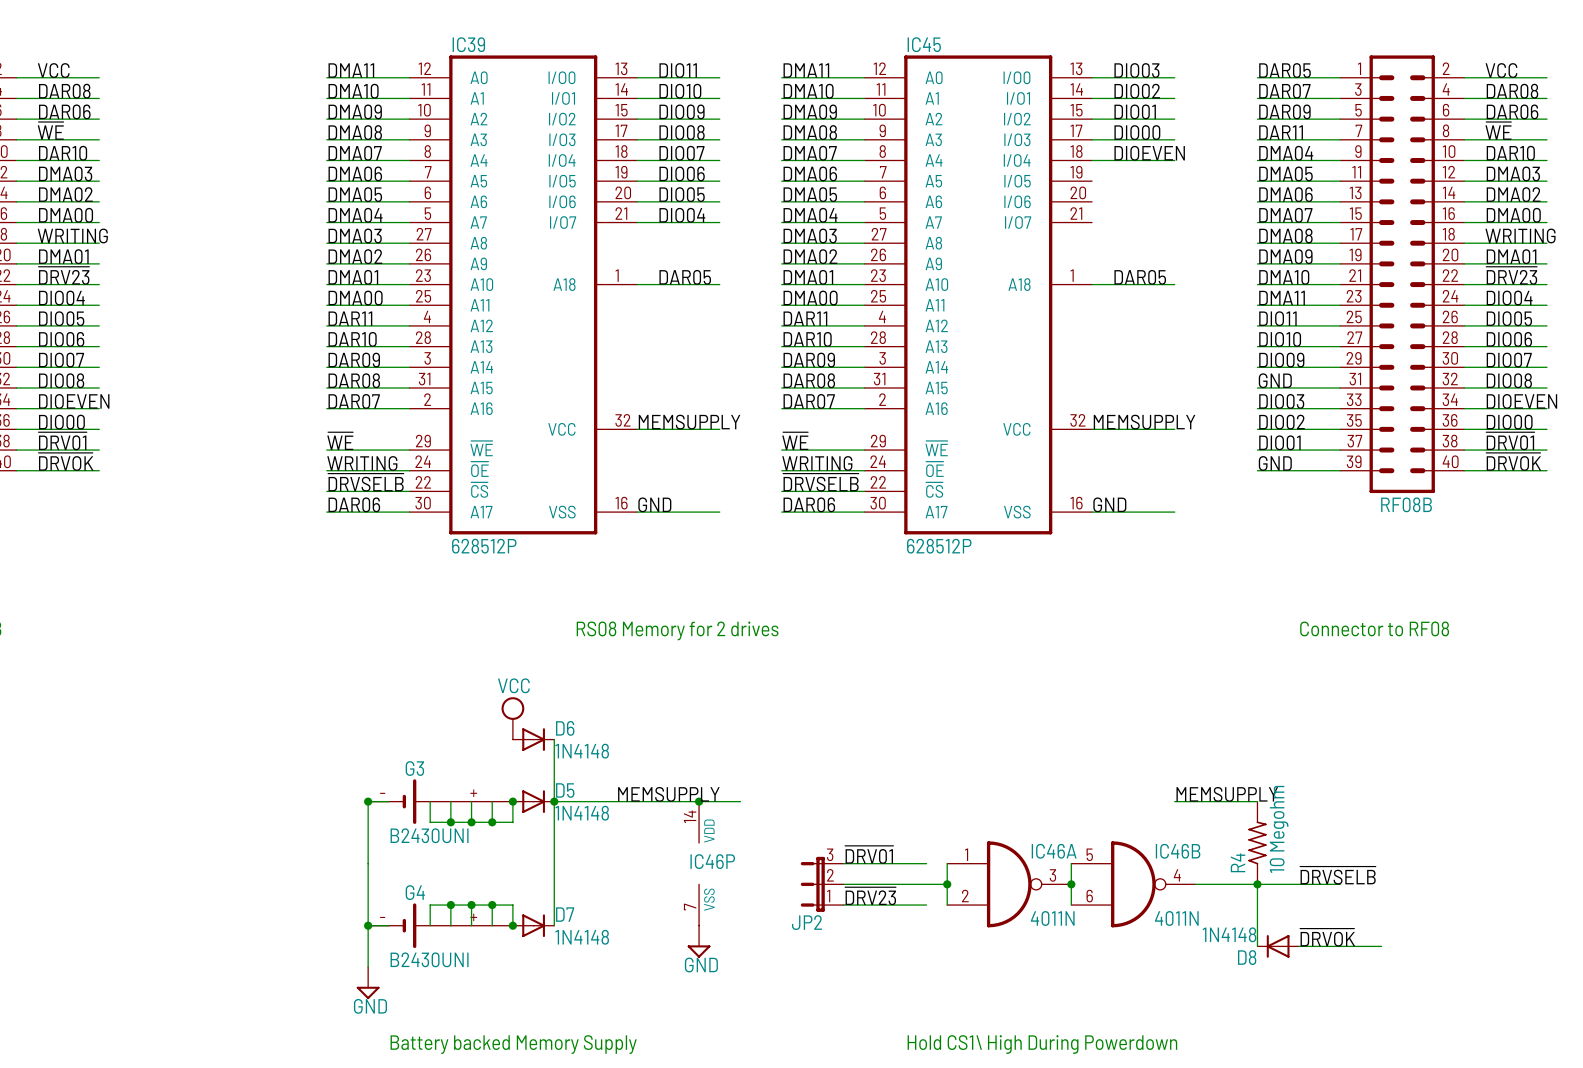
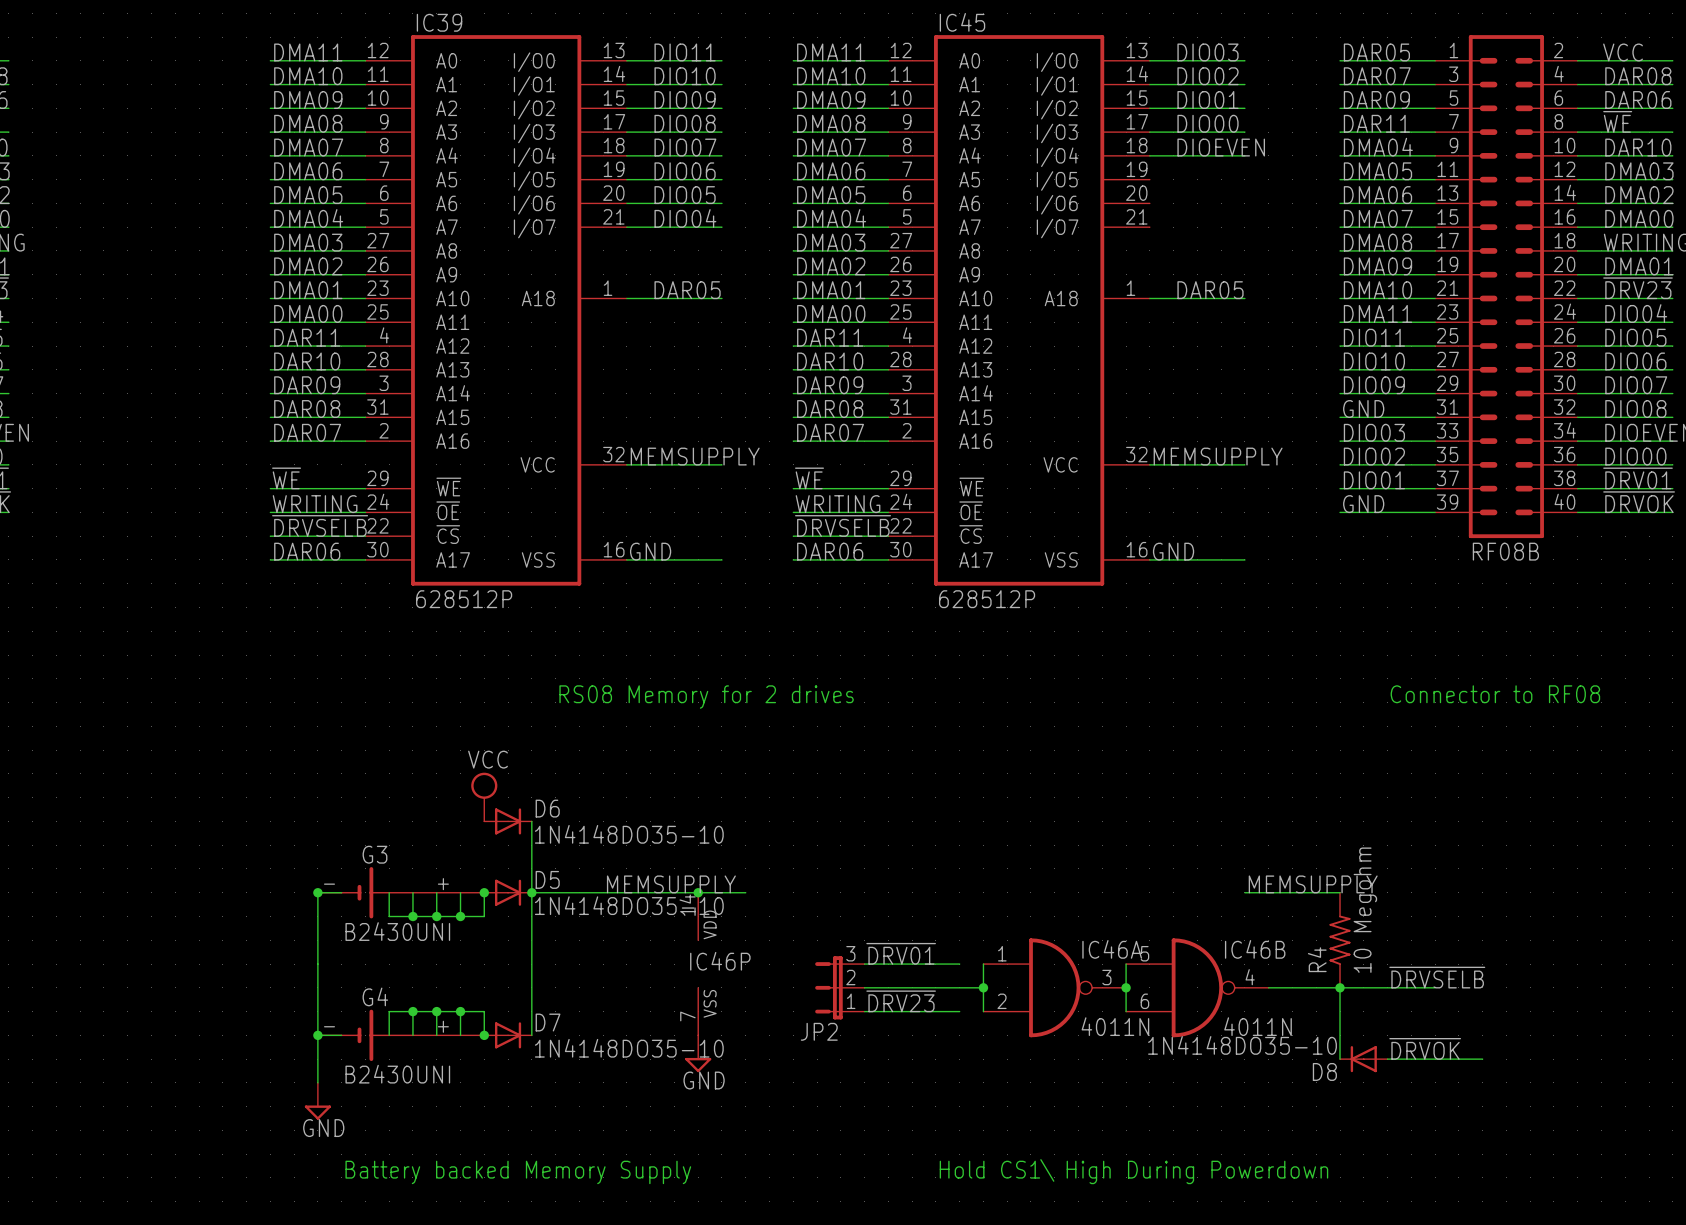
D6 value: 1N4148 (582, 751) -> 1N4148DO35-10 (629, 834)
D5 value: 1N4148 (582, 813) -> 1N4148DO35-10 (629, 905)
D8 value: 1N4148 (1229, 934) -> 1N4148DO35-10 (1242, 1045)
D7 value: 1N4148 (582, 937) -> 1N4148DO35-10 (629, 1048)

